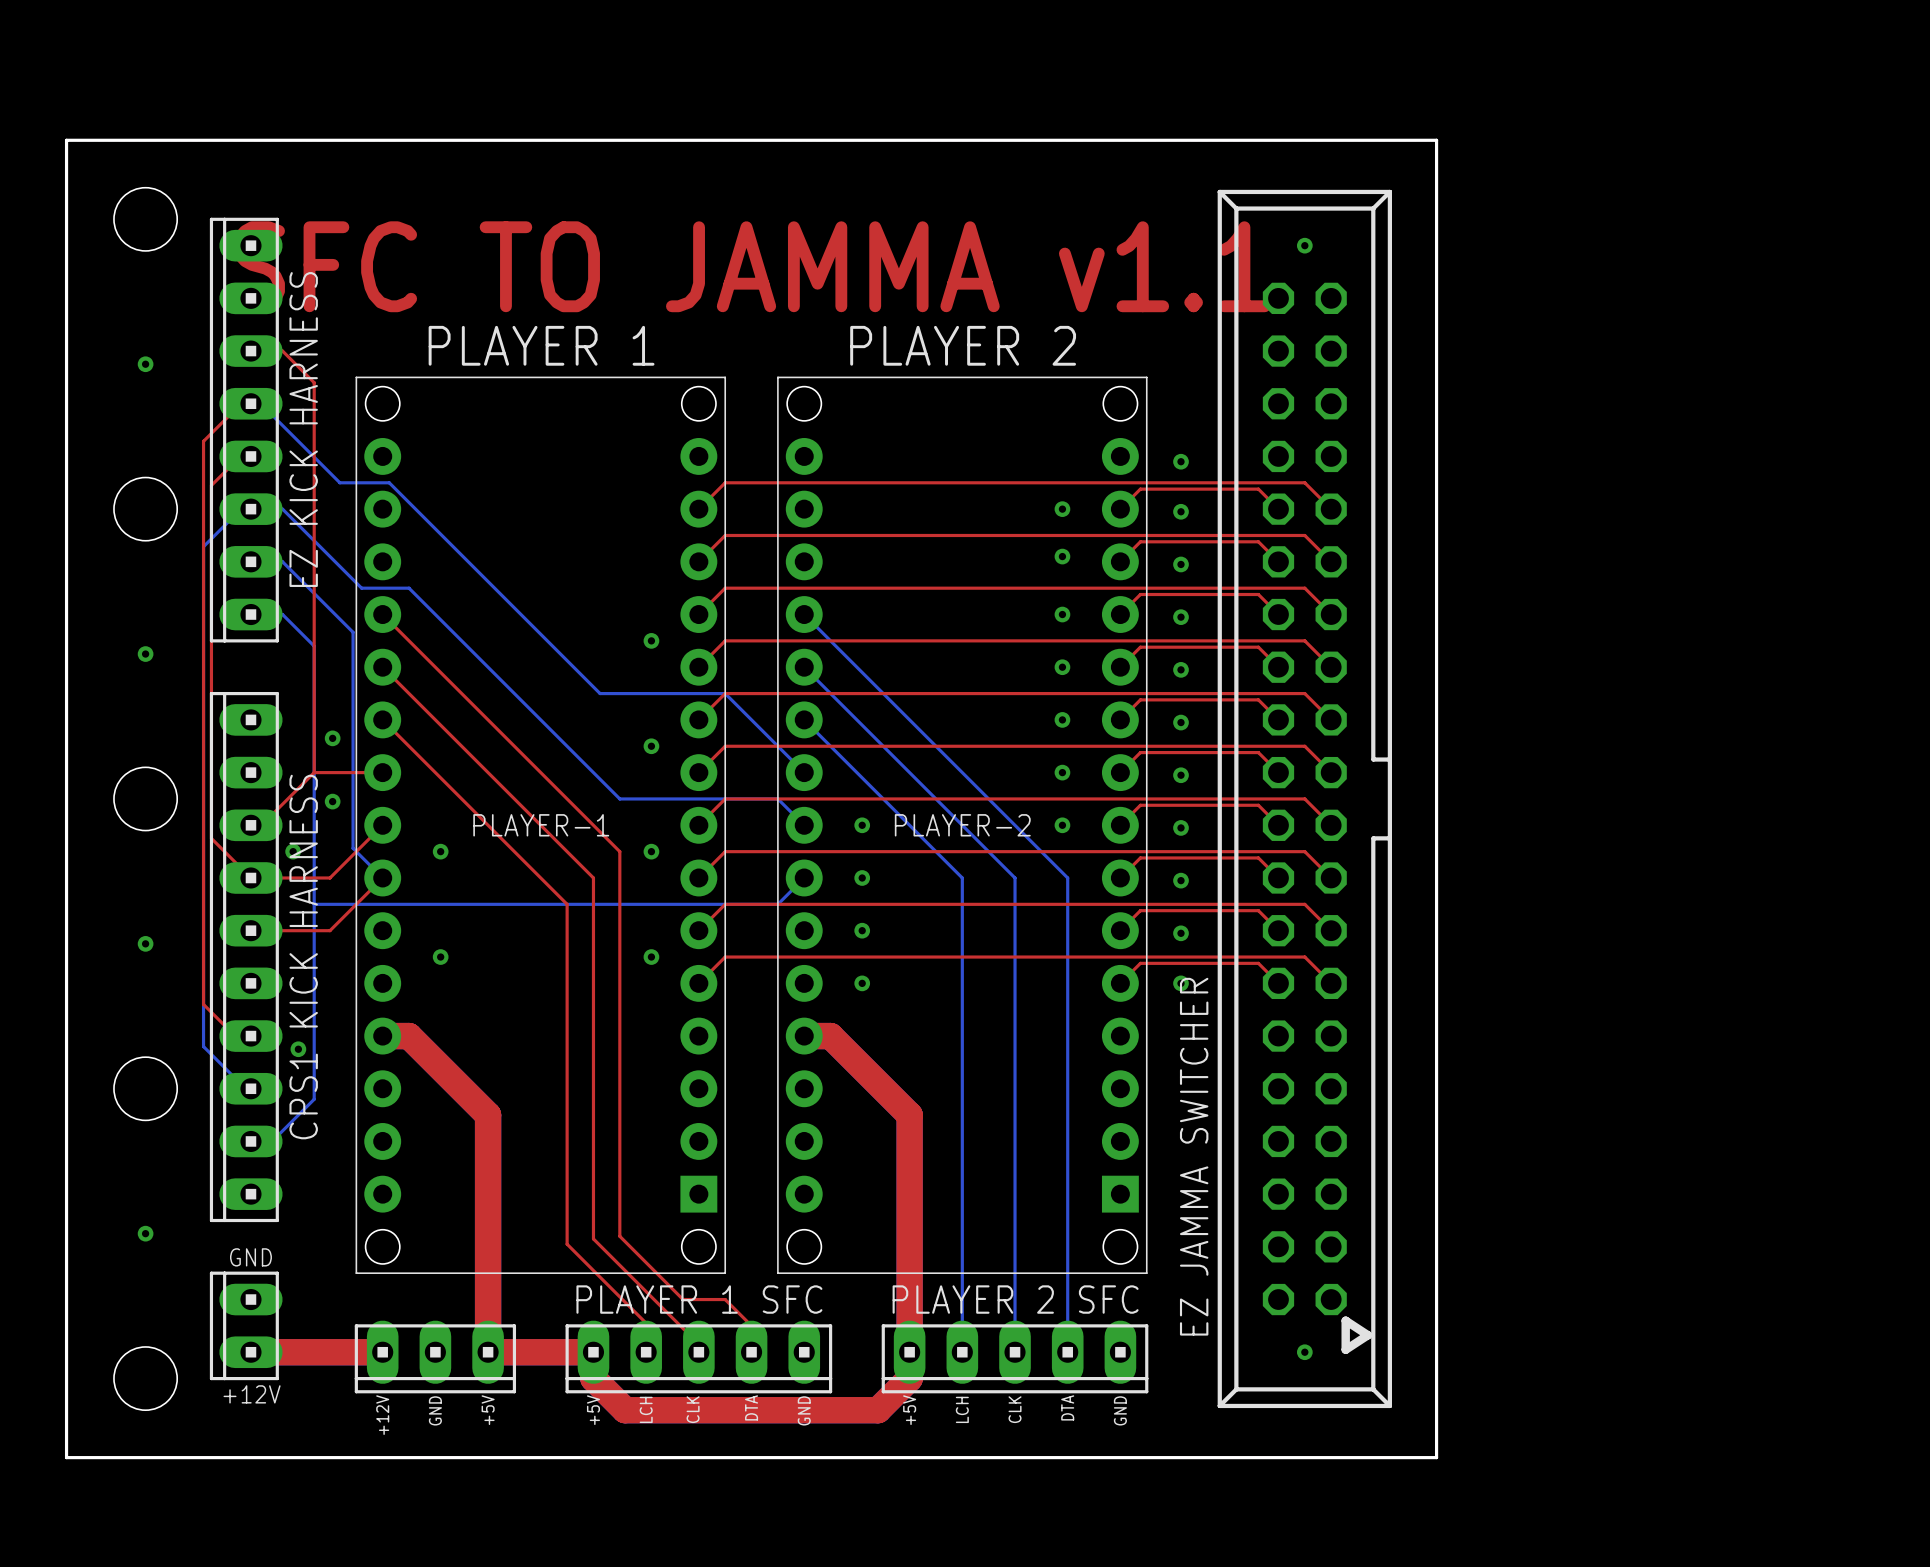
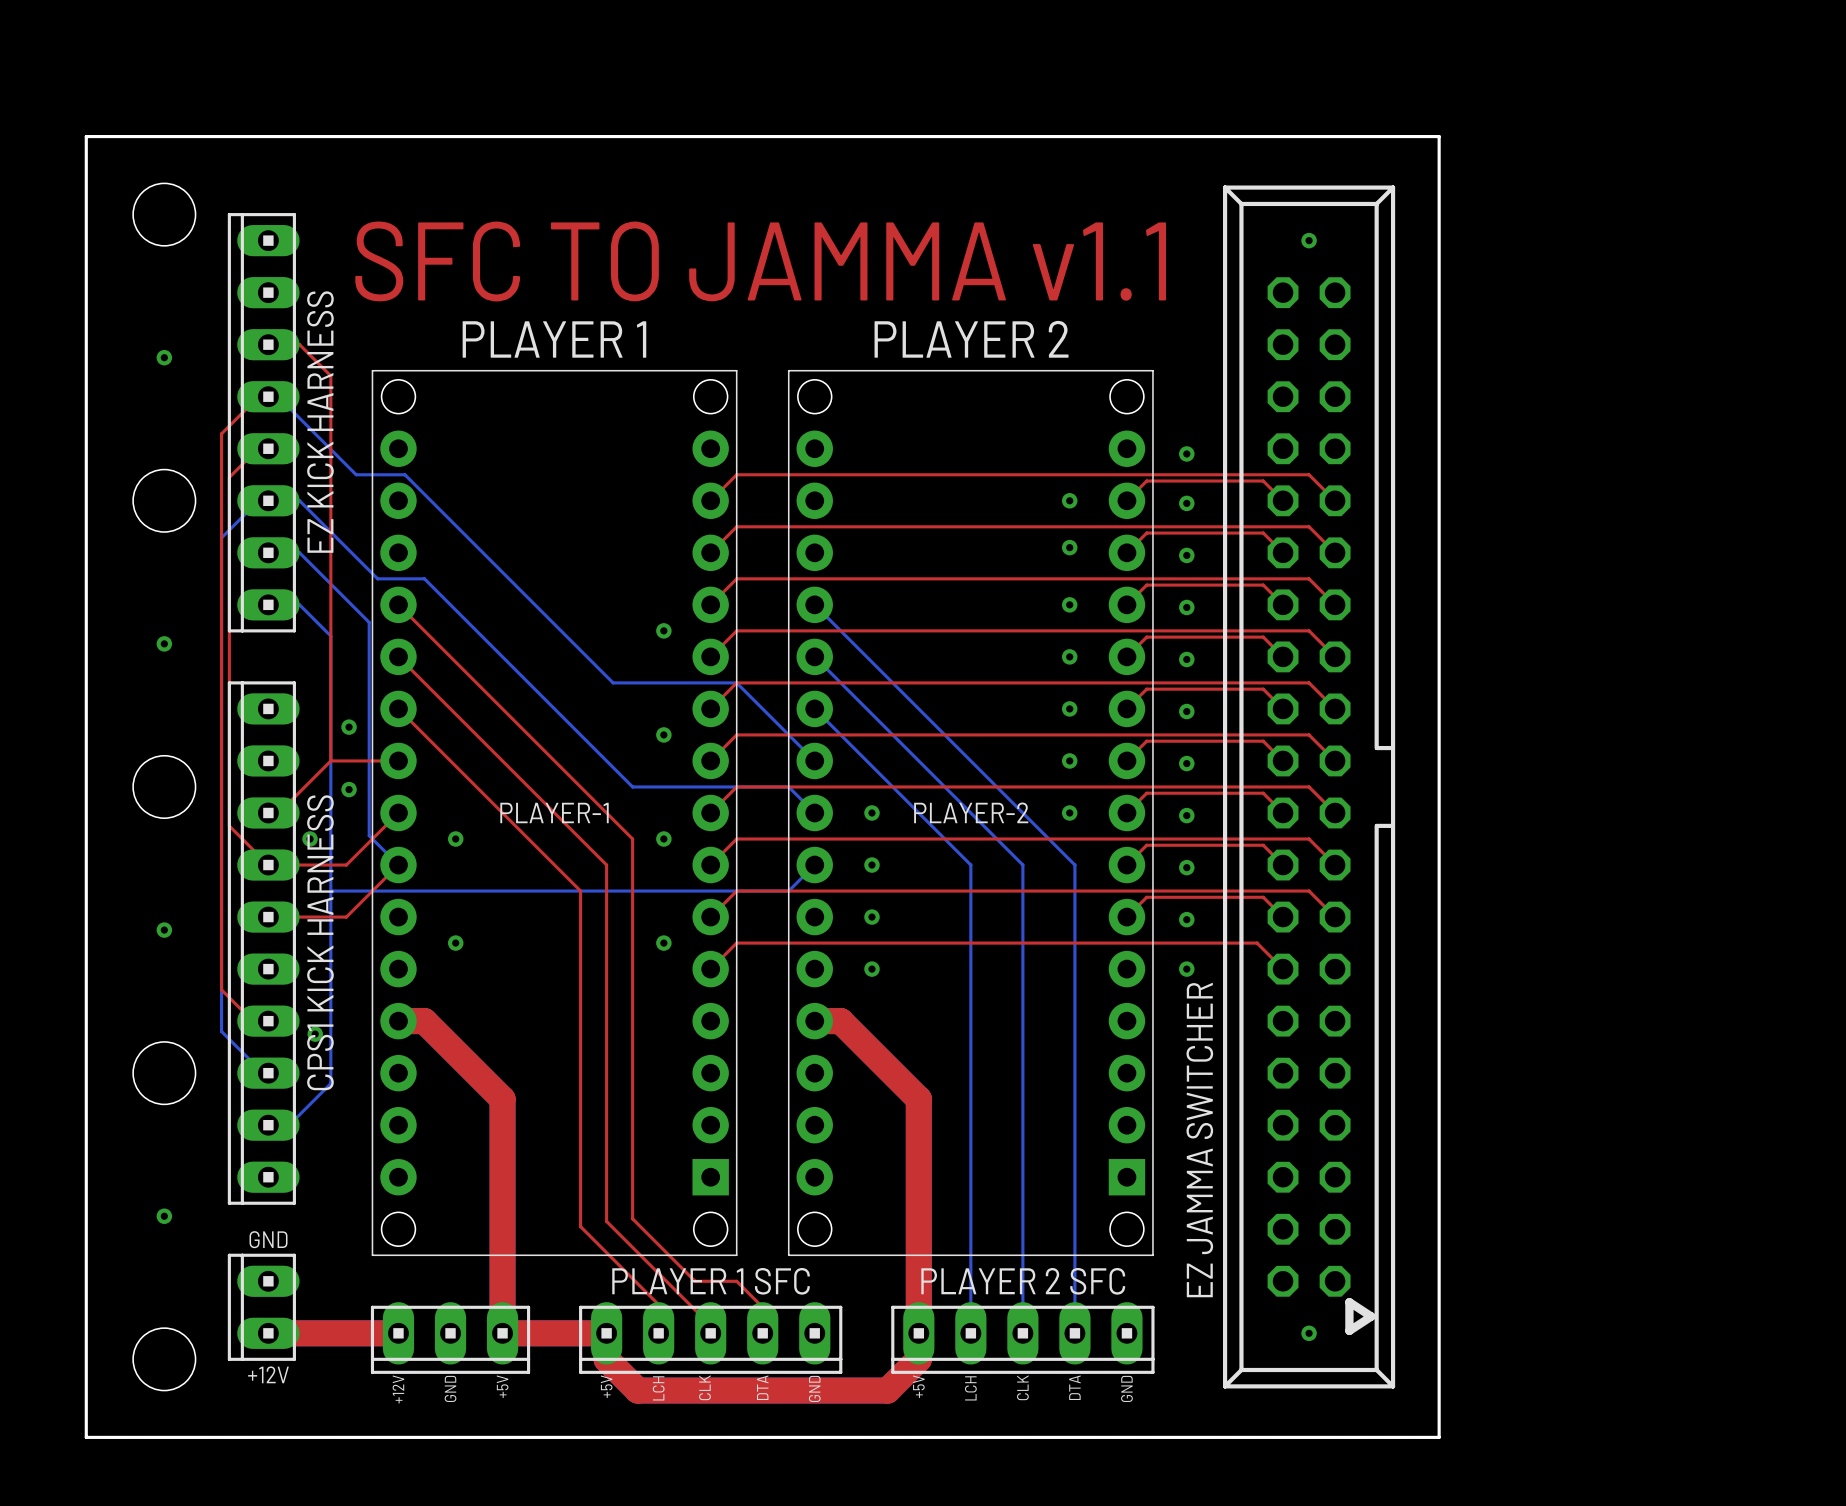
top track: (1252, 957) (1304, 957) (1331, 983) -> (1257, 943) (1263, 949)
top track: (1258, 963) (1140, 963) (1120, 983) -> none

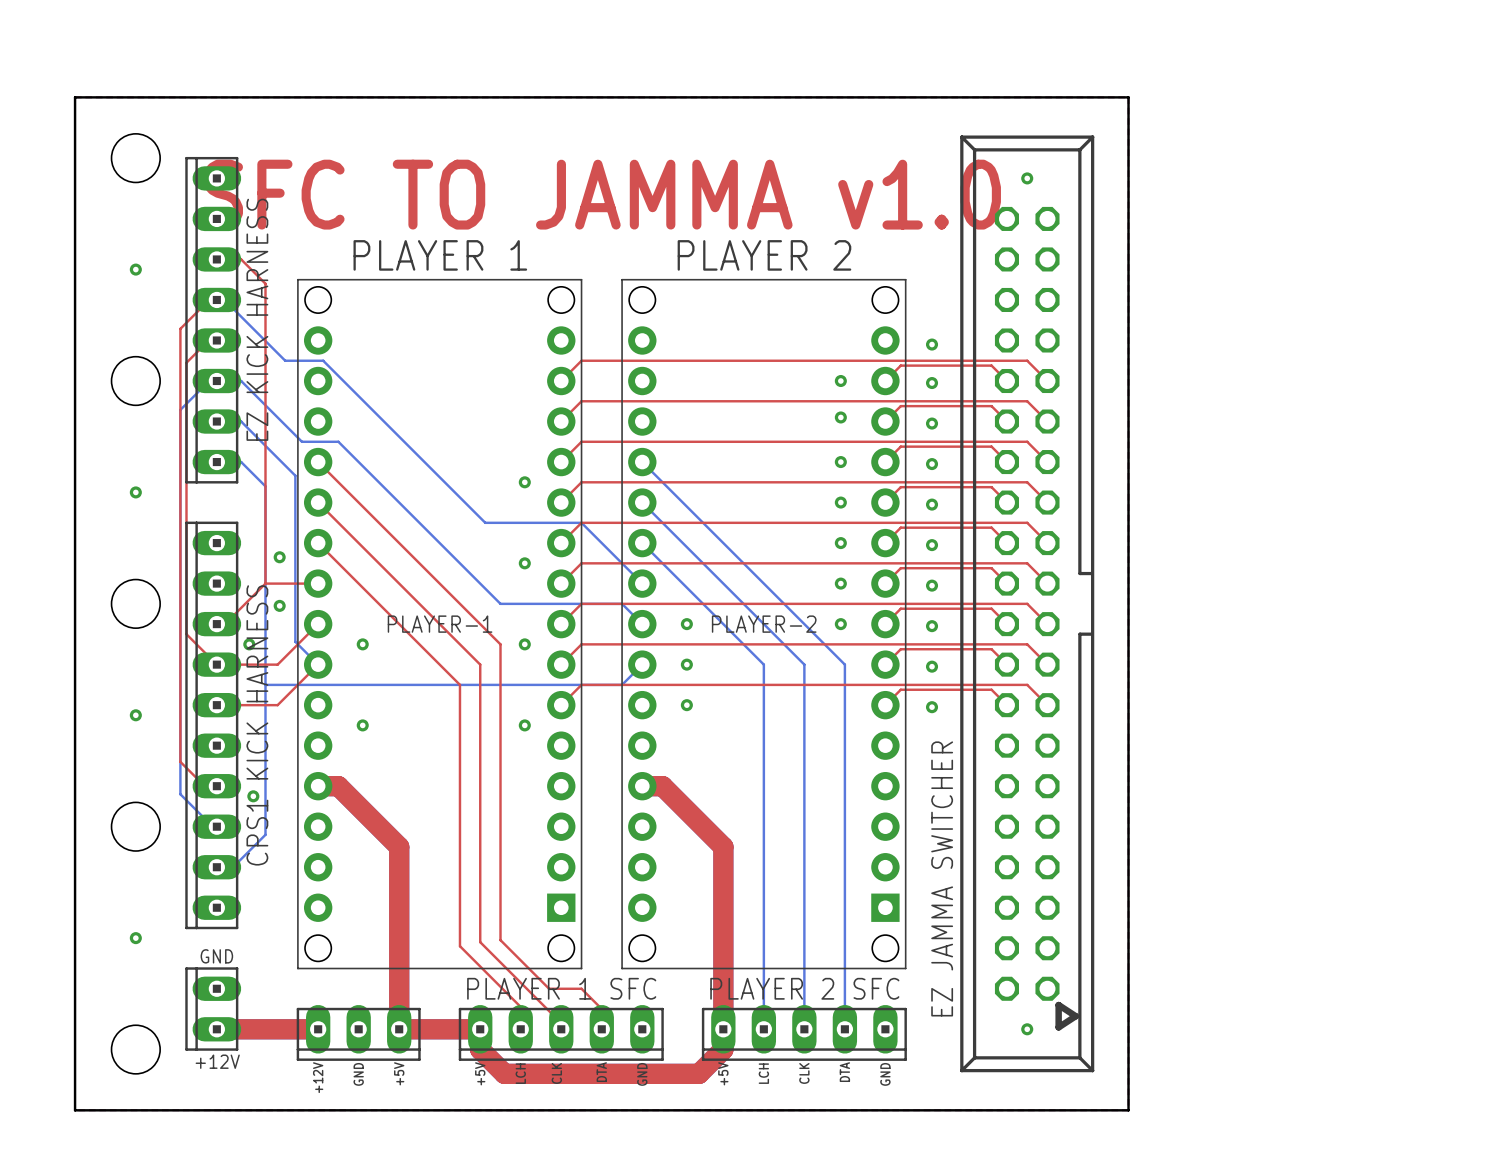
text: SFC TO JAMMA v1.1 (760, 261) -> SFC TO JAMMA v1.0 (601, 194)
top track: (710, 969) (736, 943) (1257, 943) (1283, 969) -> none
via: (871, 969) -> none
via: (1186, 969) -> none

